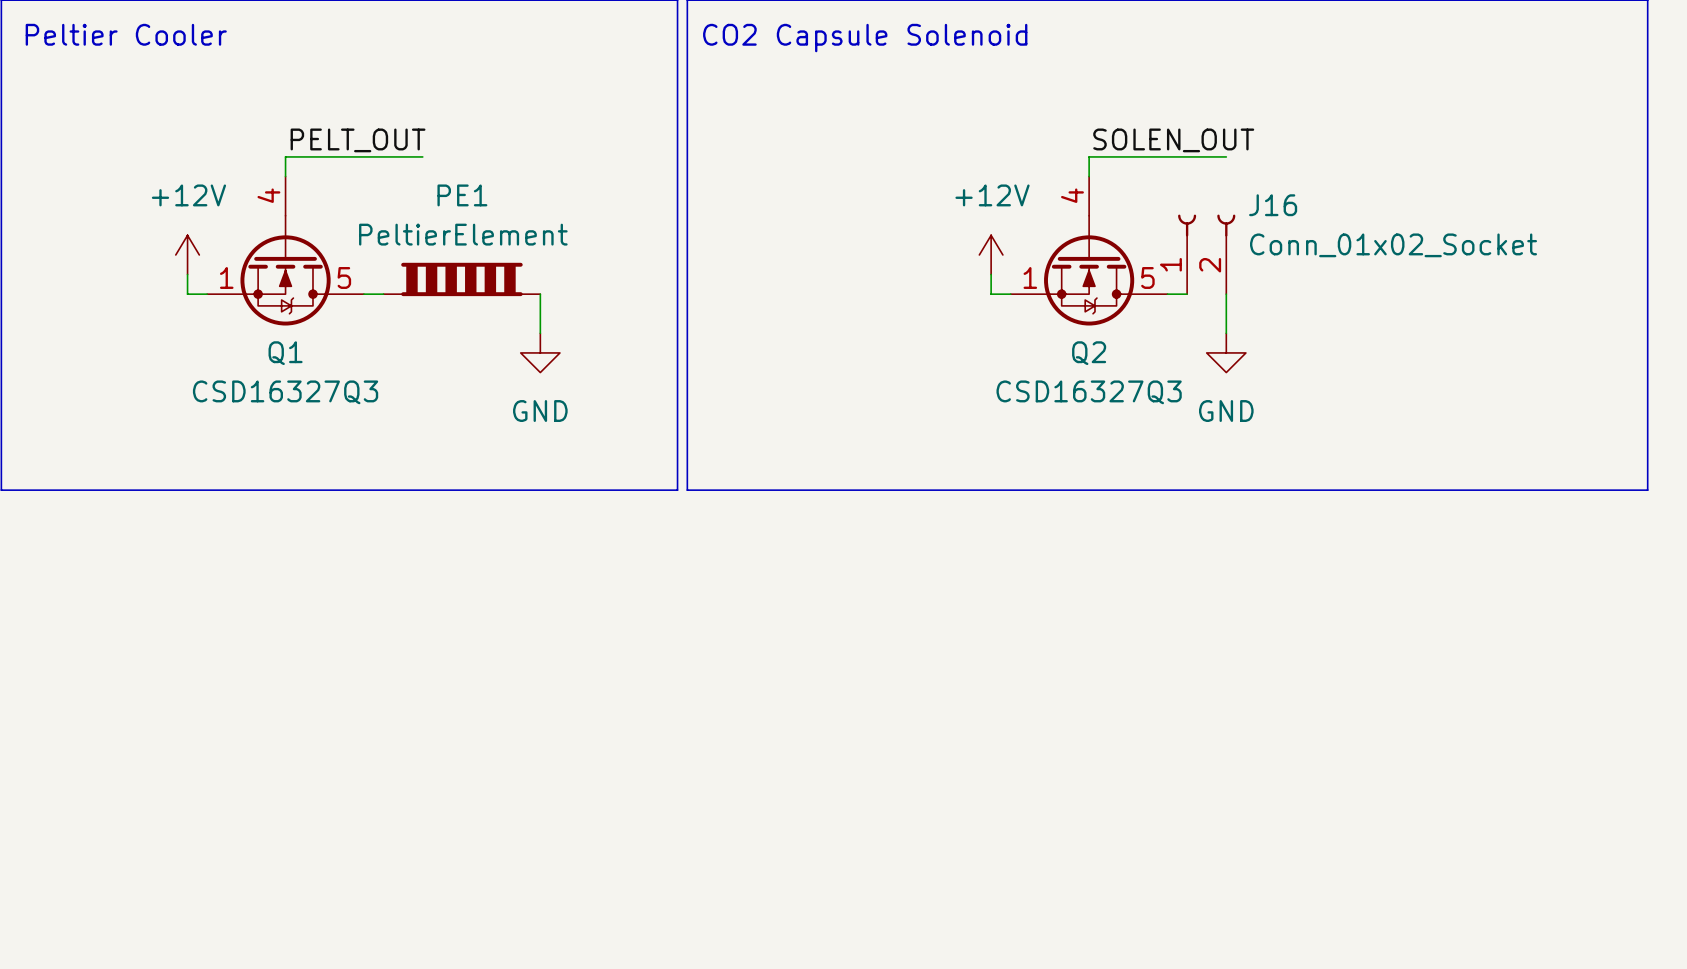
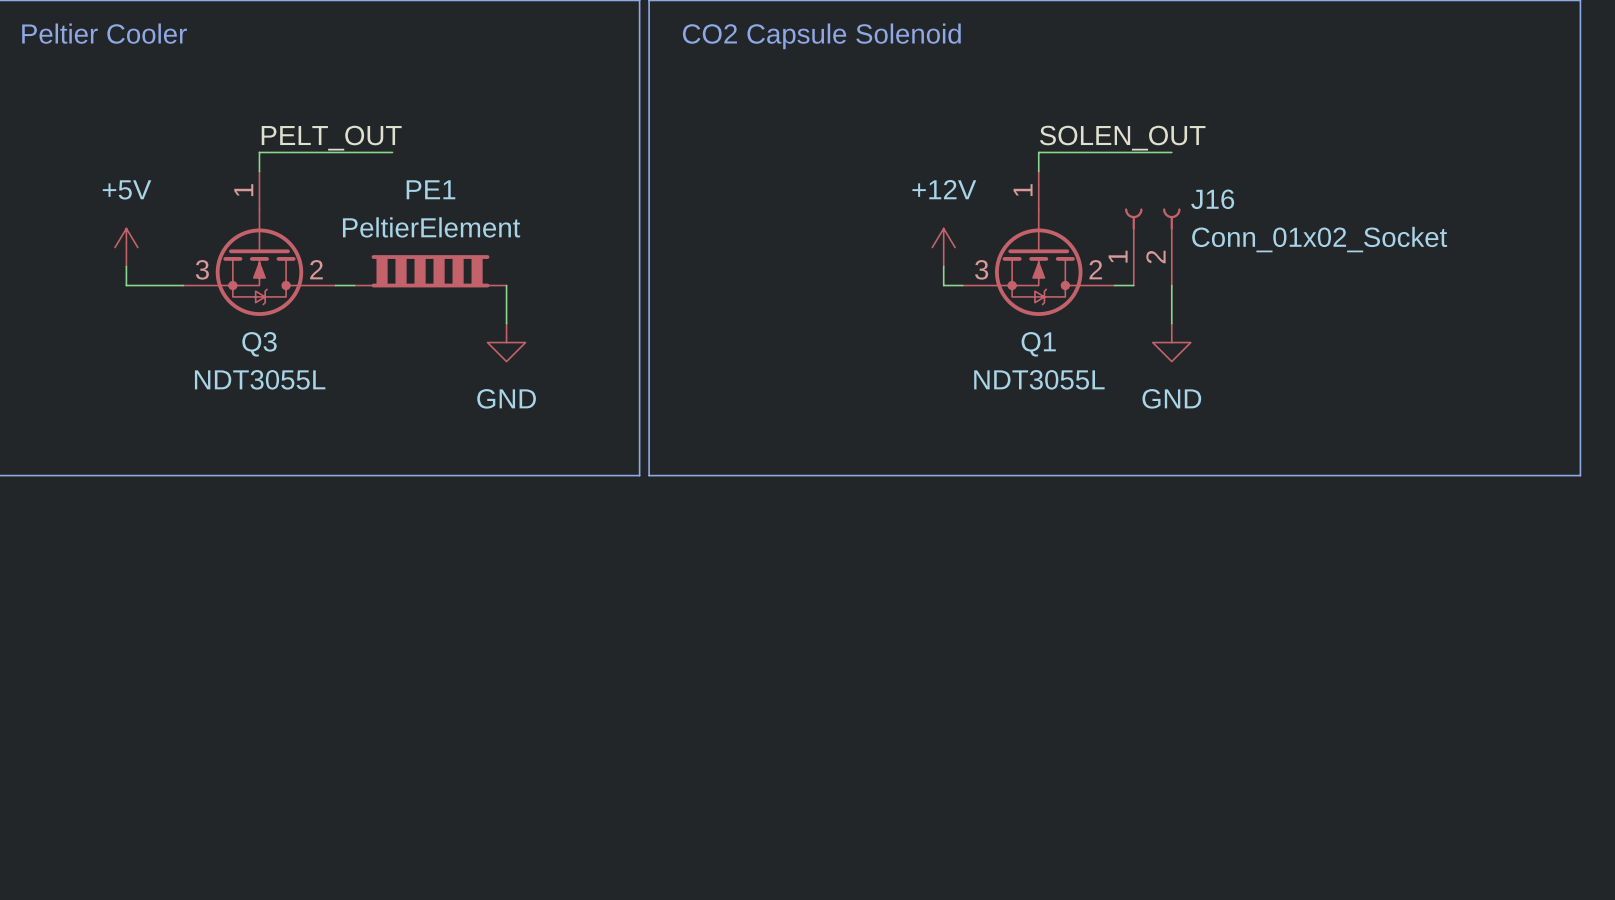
Q1 pin number: 4 (268, 195) -> 1 (1023, 190)
Q1 position: (285, 251) -> (1038, 243)
Q3: none -> NDT3055L (259, 243)
Q2: CSD16327Q3 (1089, 251) -> none
power symbol: none -> +5V (126, 247)
power symbol: +12V (187, 254) -> none
wire: (187, 274) (187, 294) -> (126, 266) (126, 285) (164, 285)
Q1 pin number: 1 (226, 277) -> 3 (981, 269)
Q1 pin number: 5 (344, 277) -> 2 (1095, 269)
Q1 value: CSD16327Q3 (285, 392) -> NDT3055L (1039, 379)

